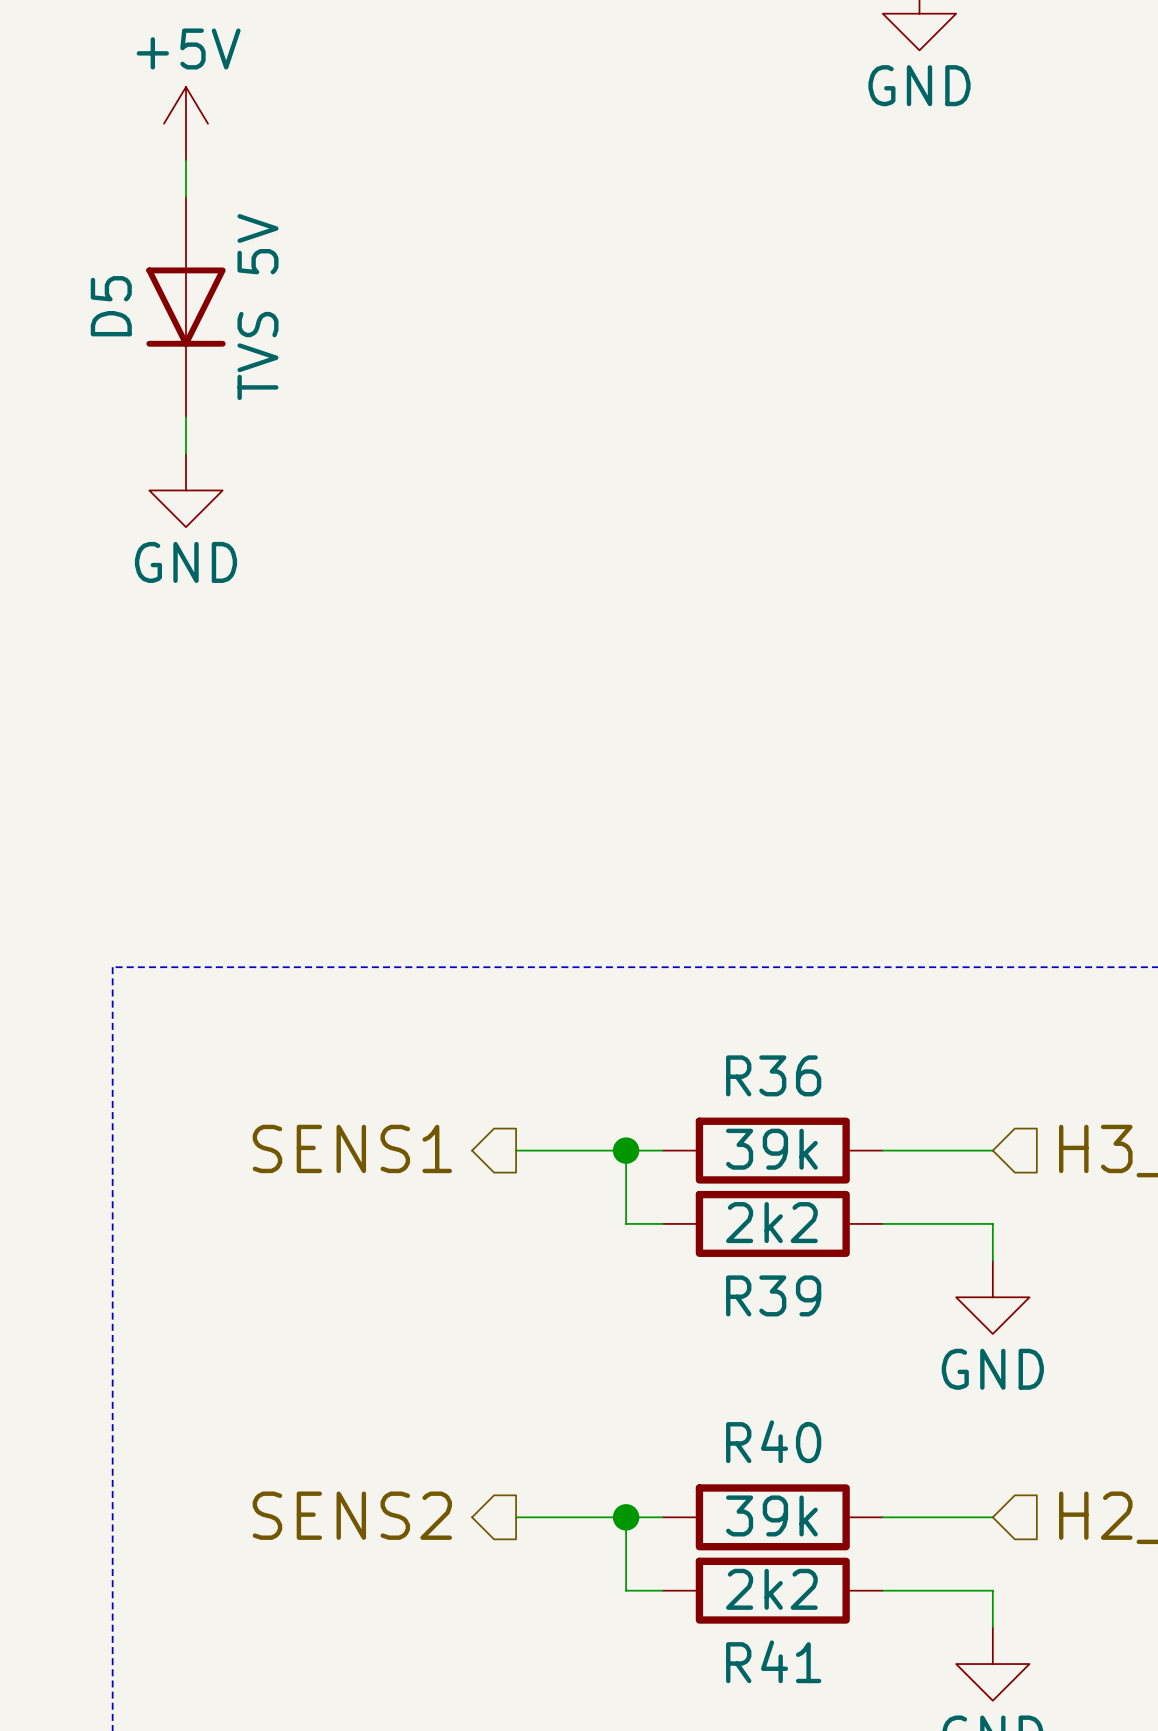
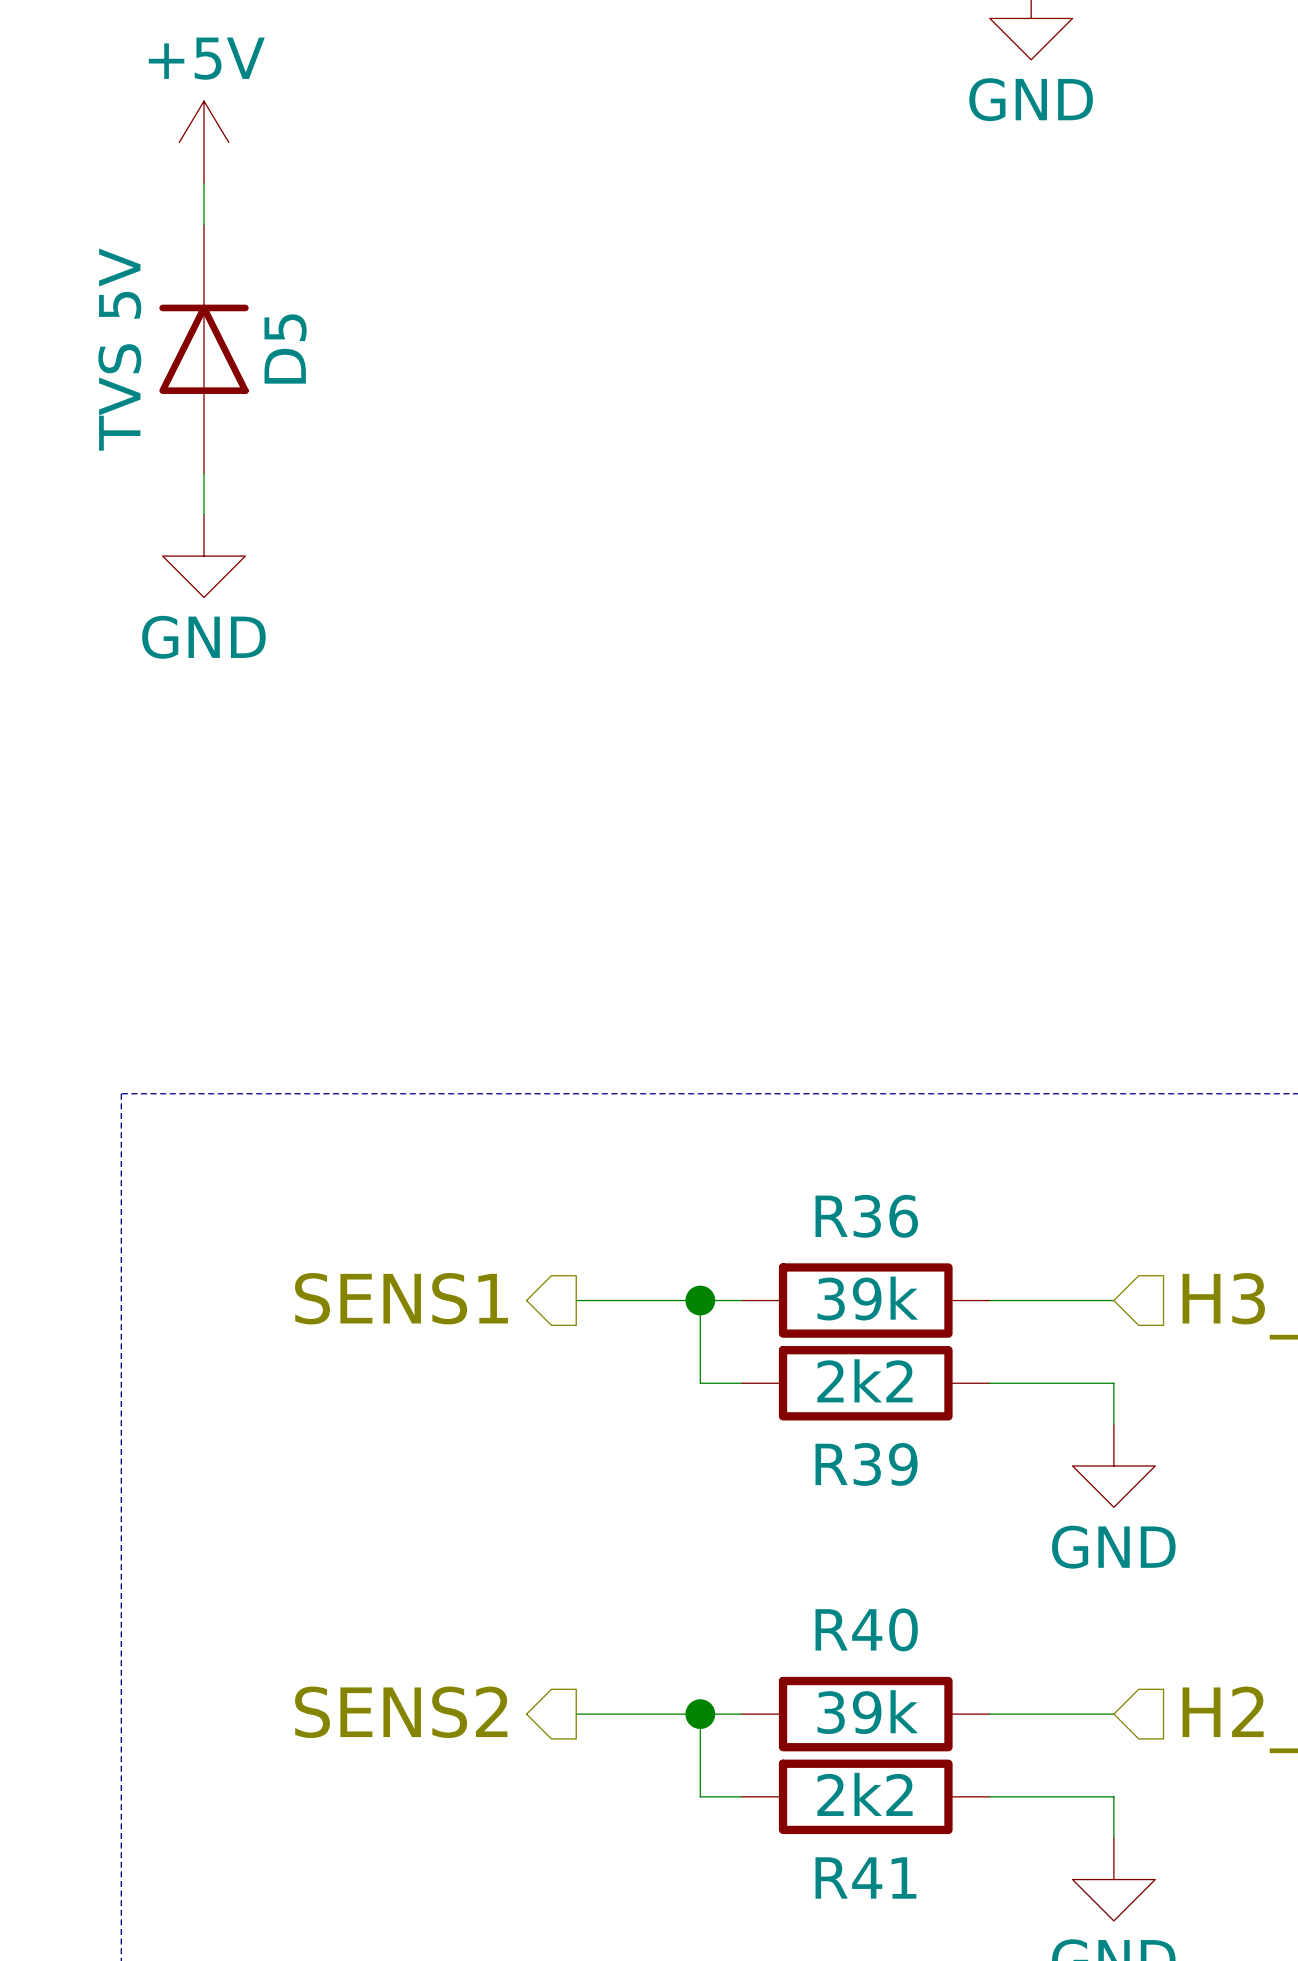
D5 rotation: 0° (186, 307) -> 180° (204, 349)

